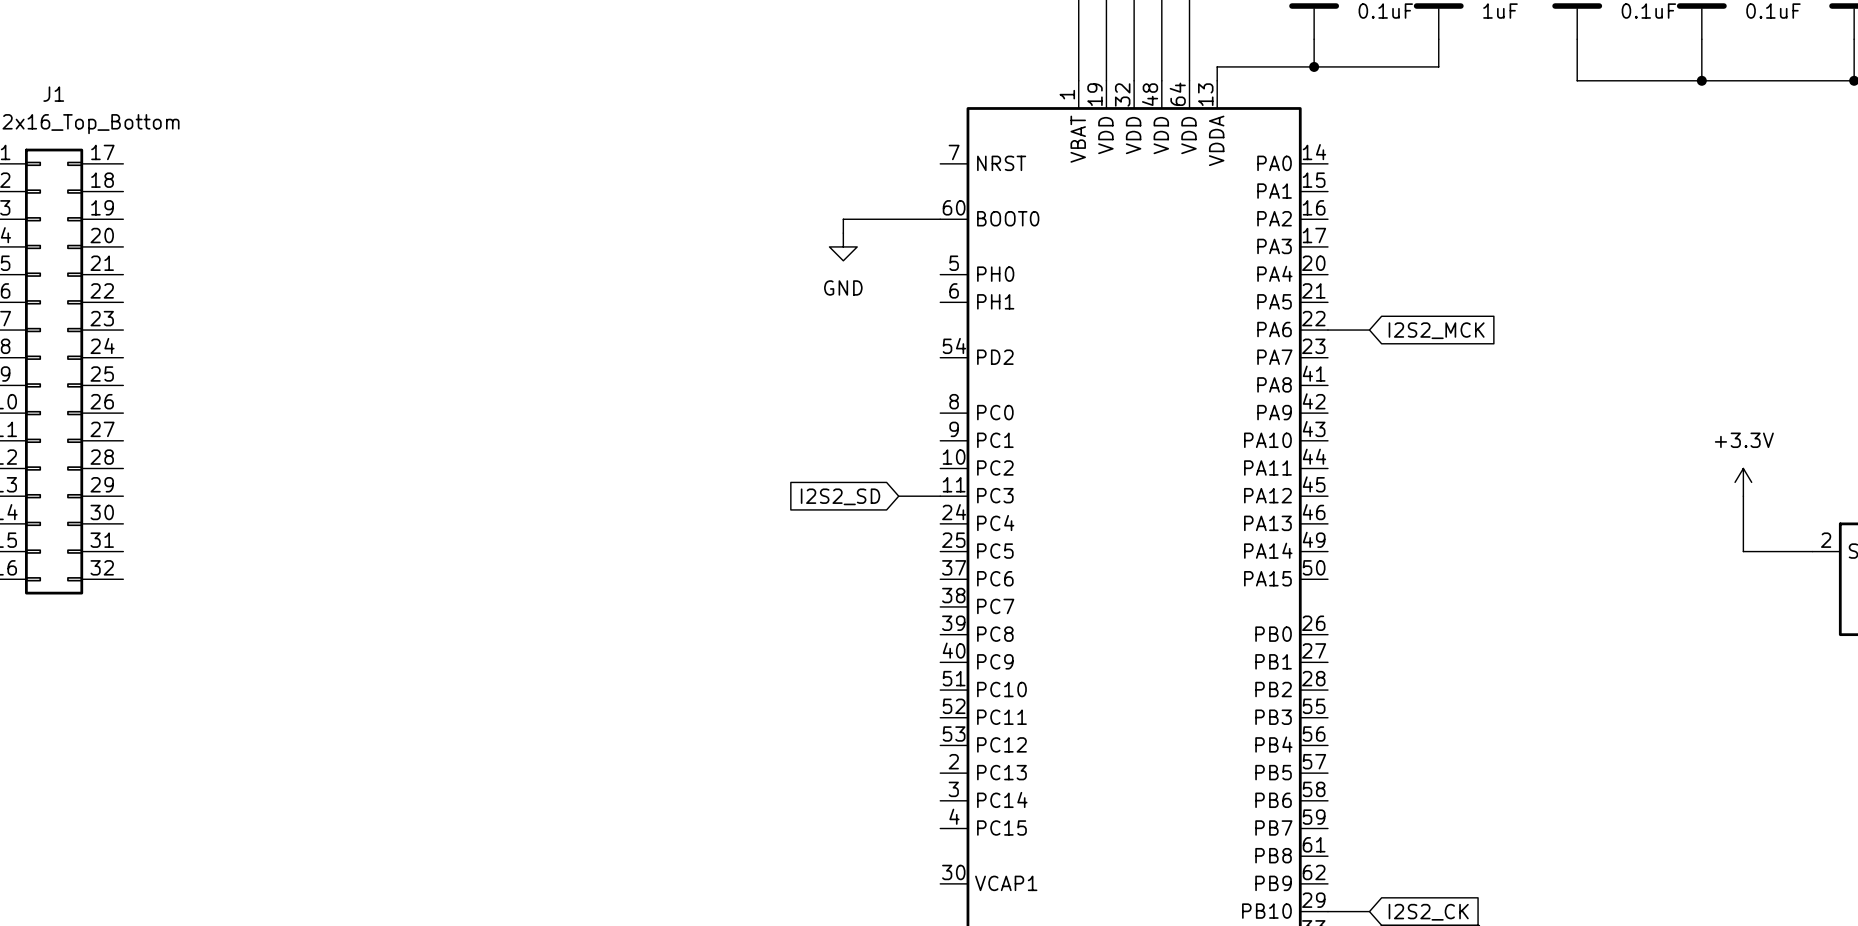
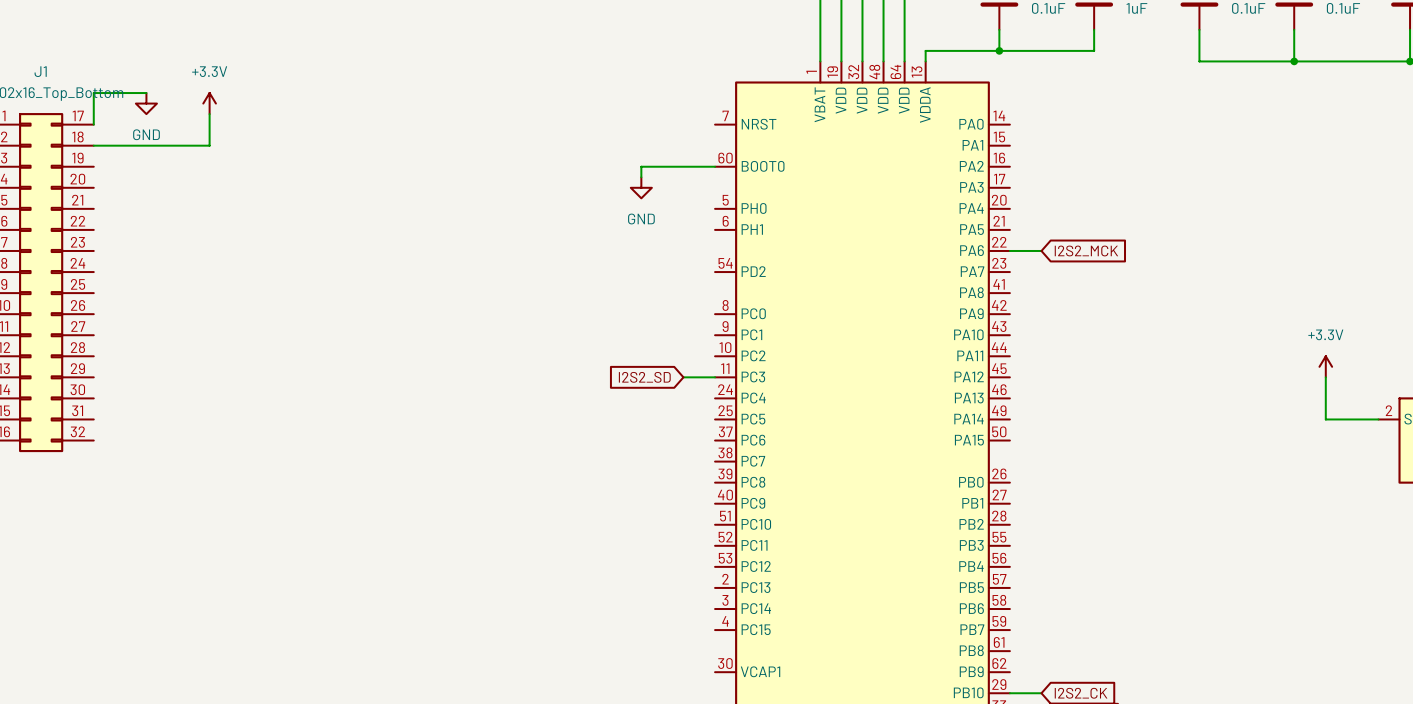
wire: none -> (146, 93) (93, 93) (93, 124)
power symbol: none -> GND (146, 103)
power symbol: none -> +3.3V (209, 103)
wire: none -> (209, 114) (209, 145) (93, 145)

